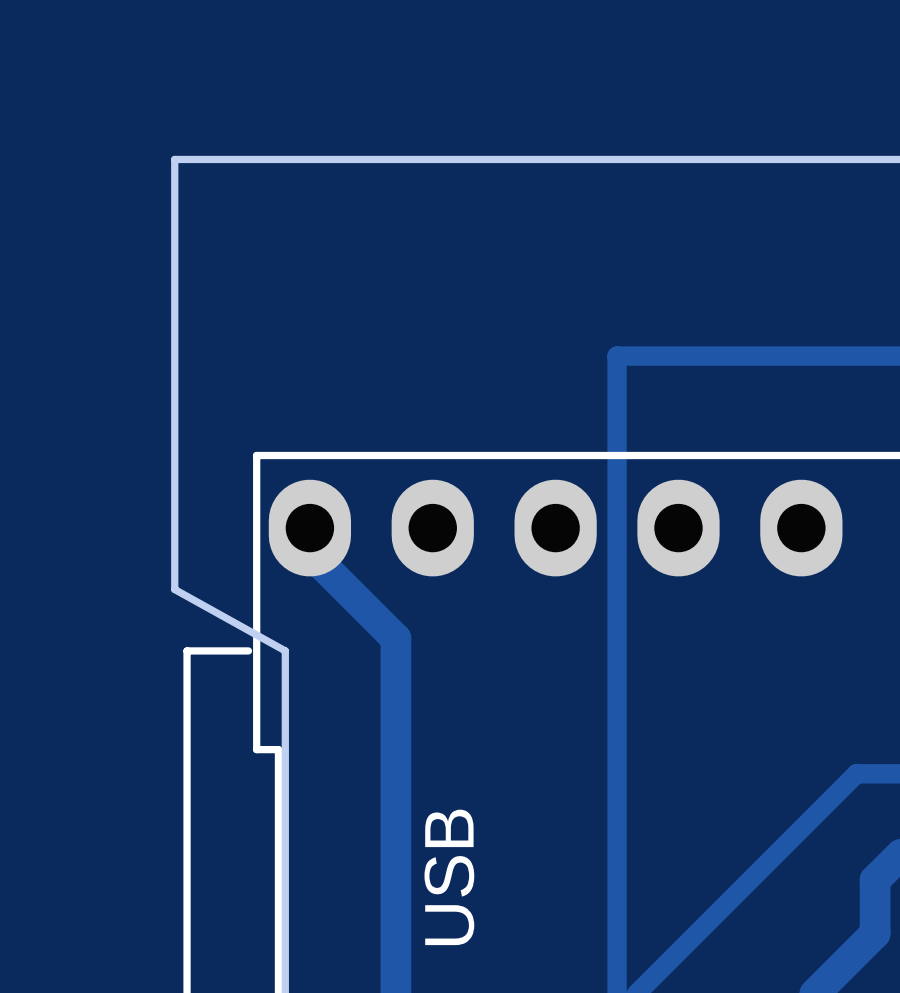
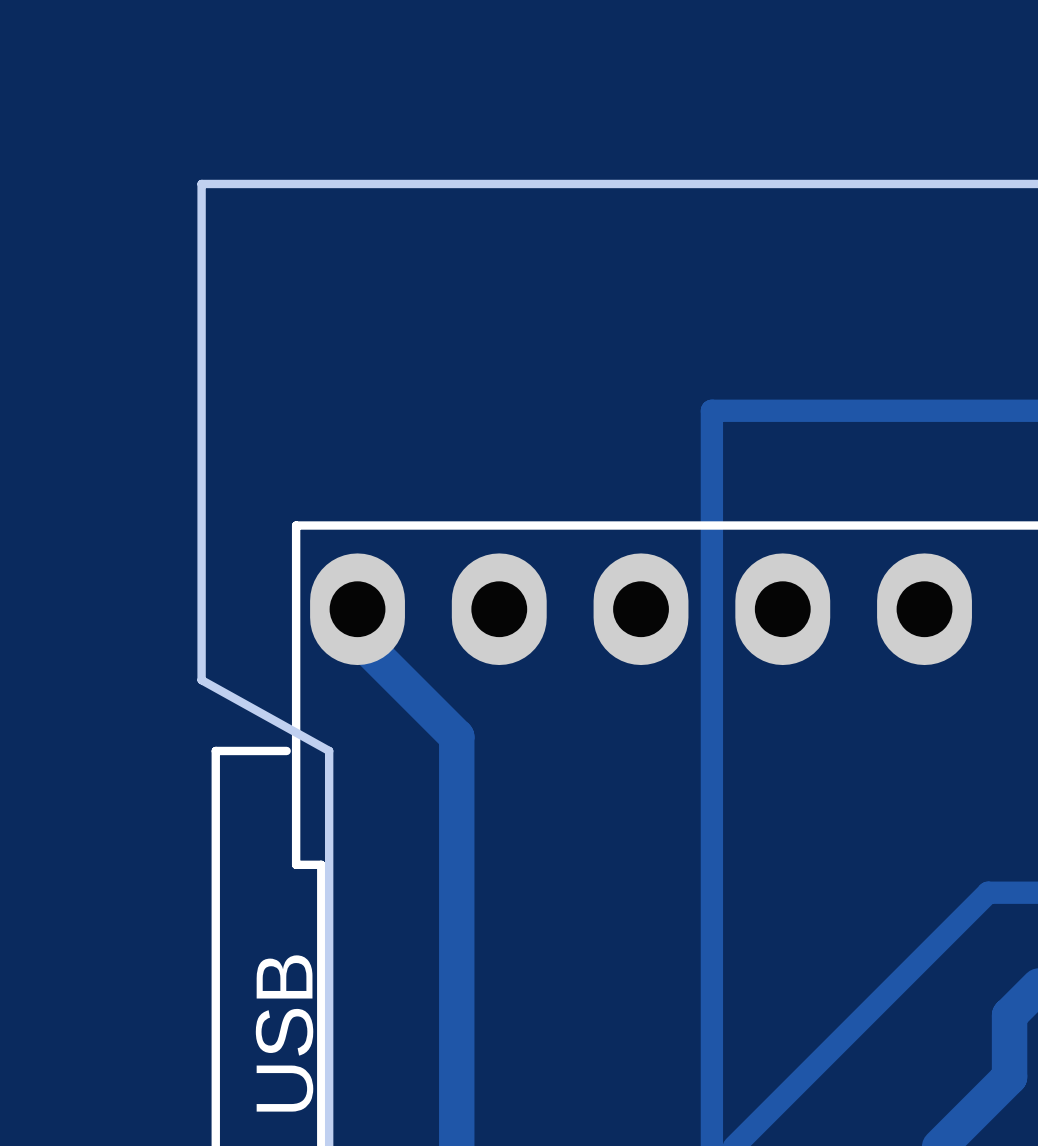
part text position: USB (449, 877) -> USB (284, 1033)

